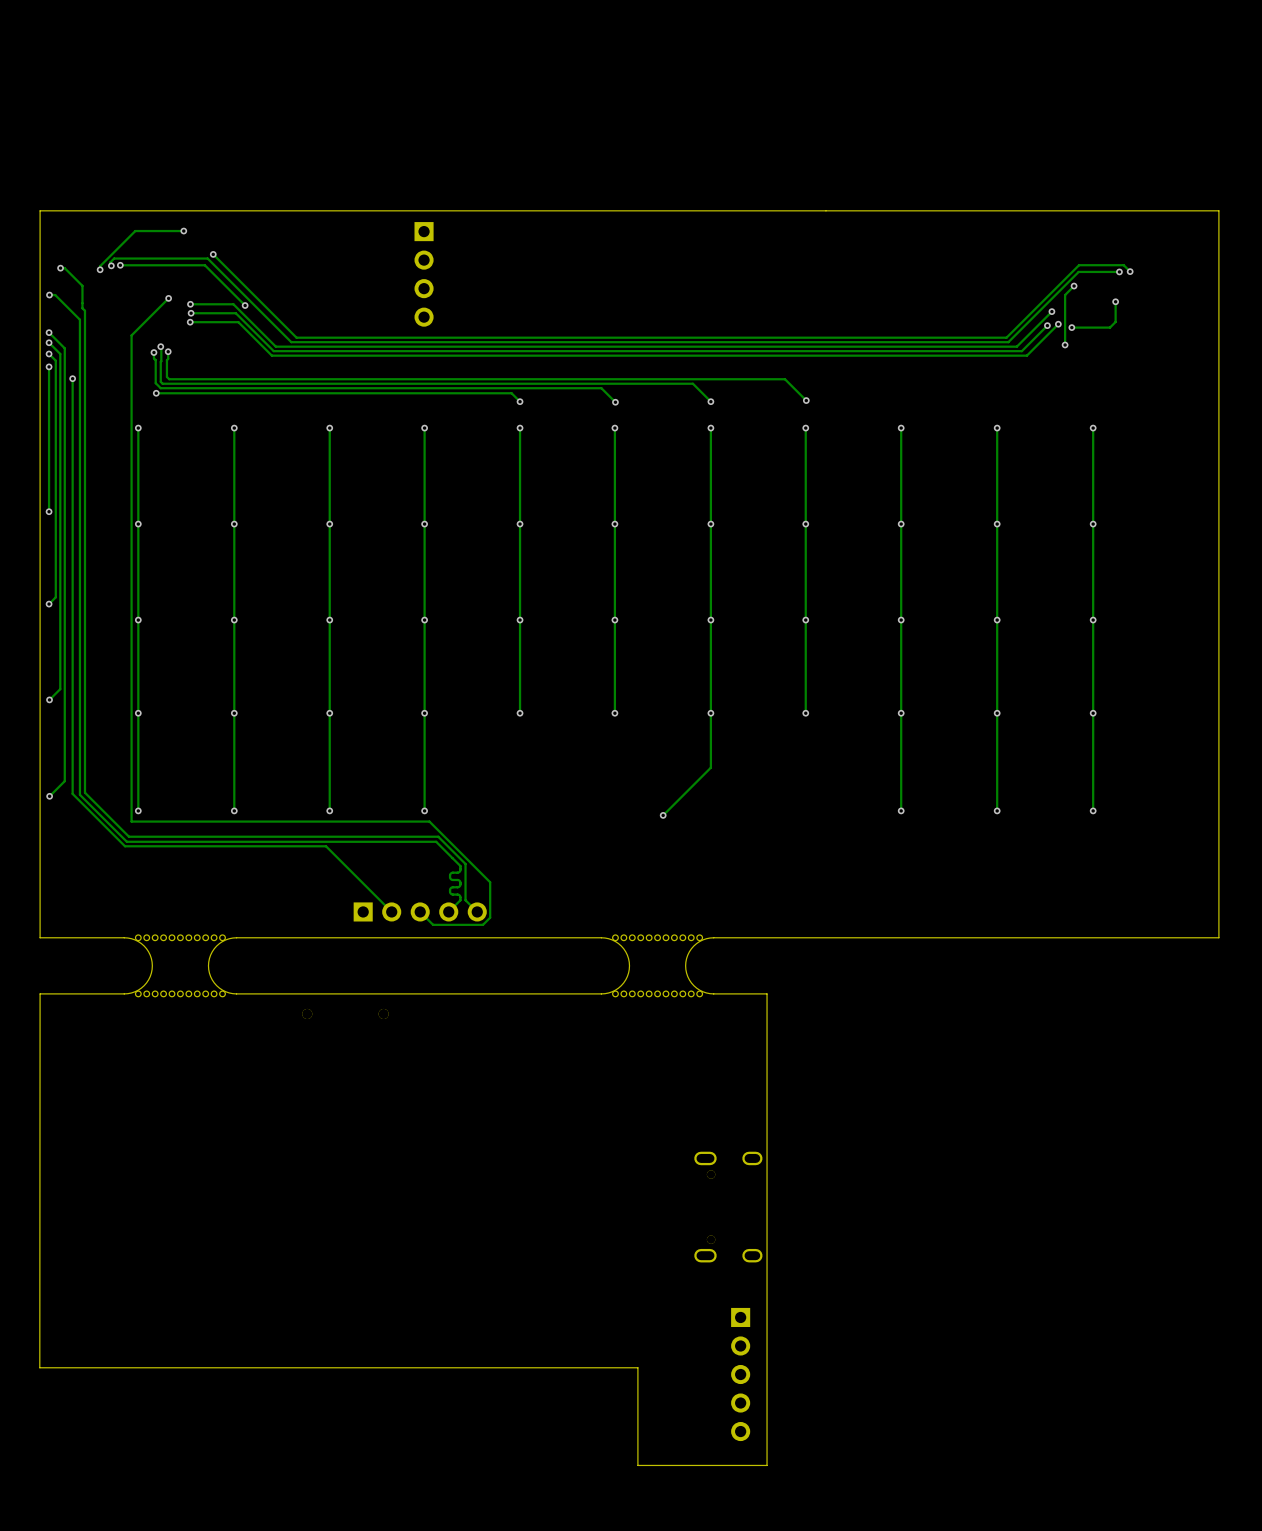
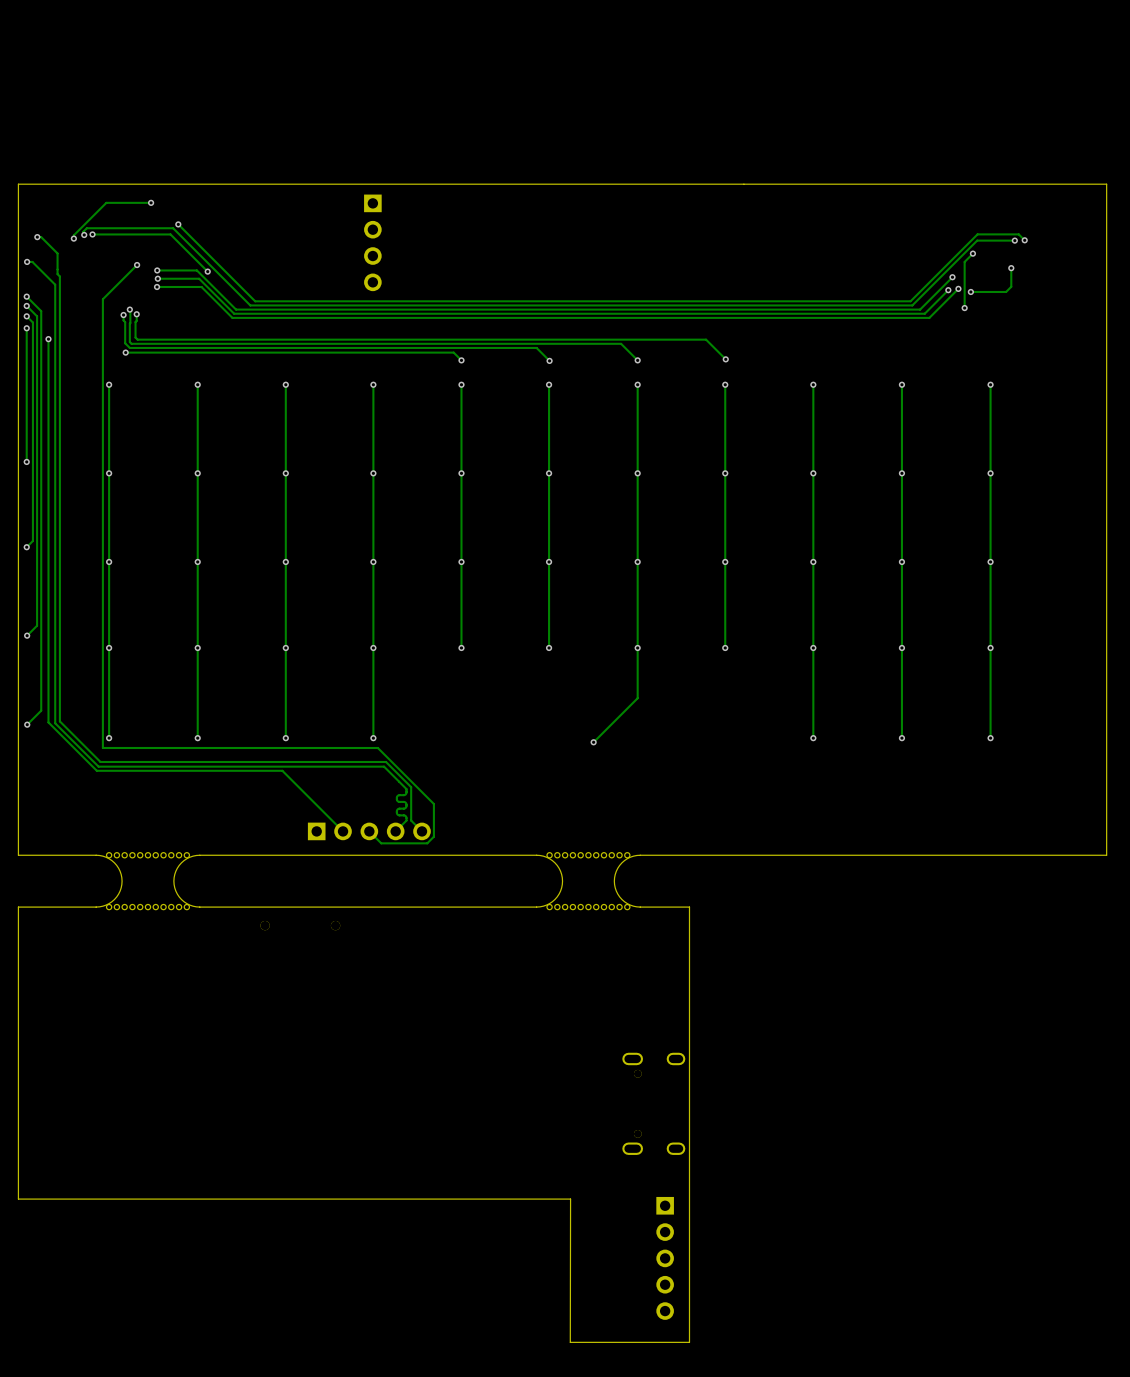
board edge: (40, 993) (39, 1367) (637, 1367) (637, 1465) -> (18, 907) (18, 1199) (570, 1199) (570, 1342)

